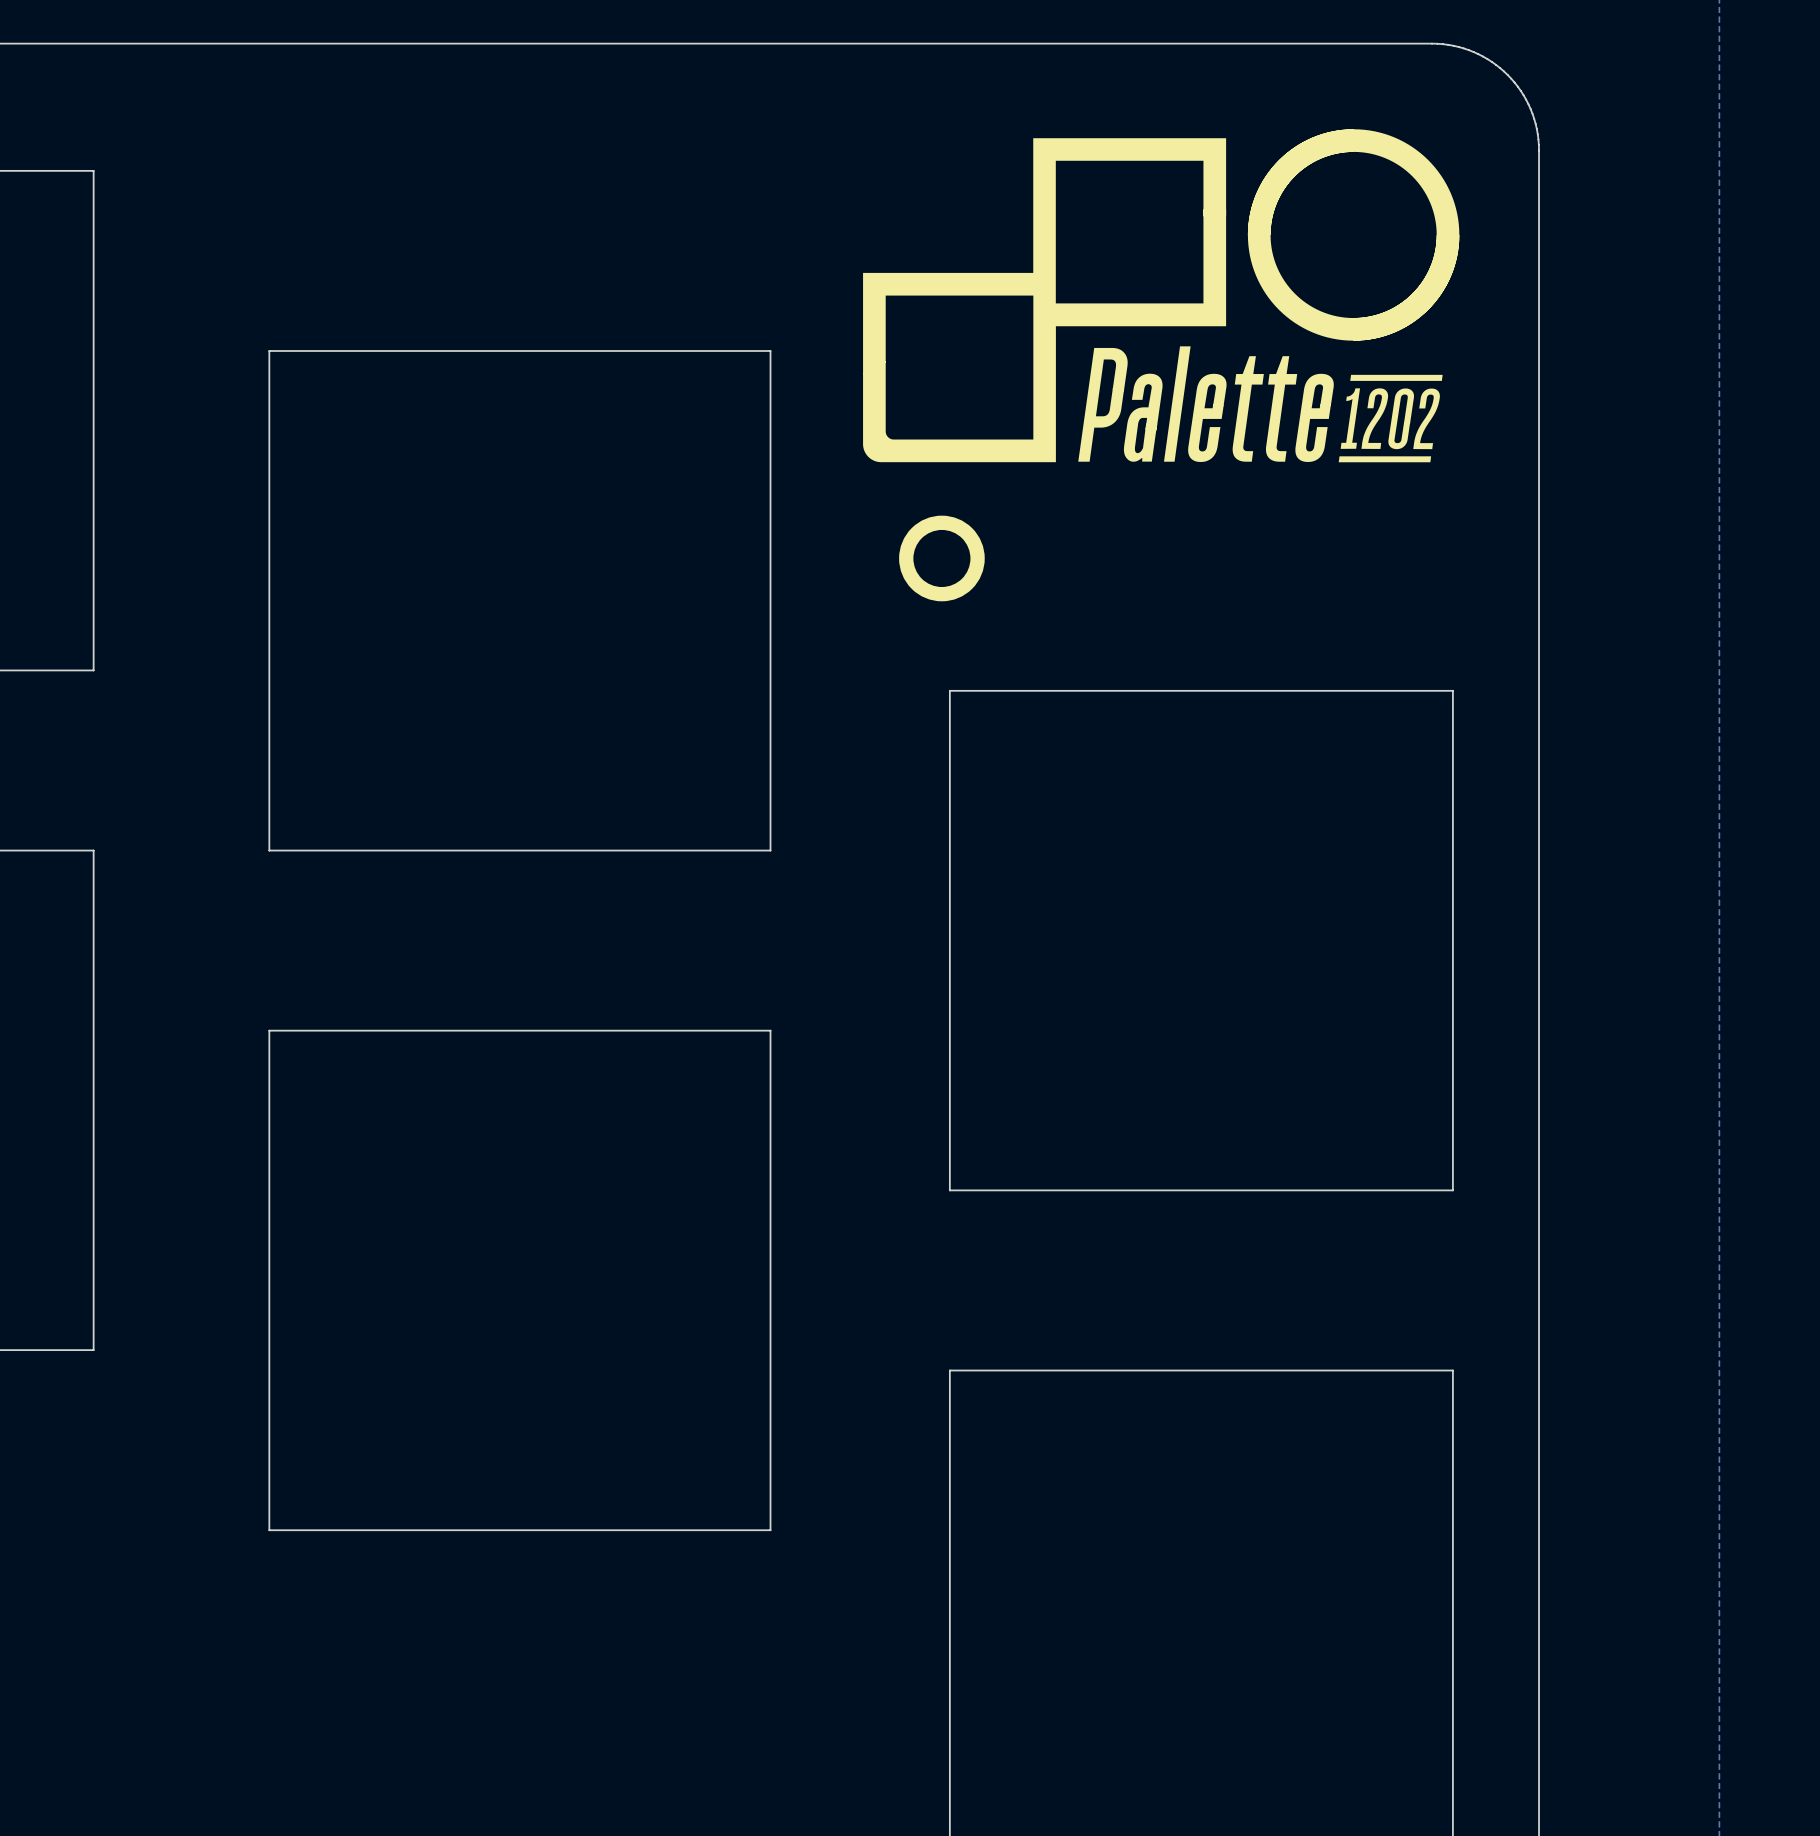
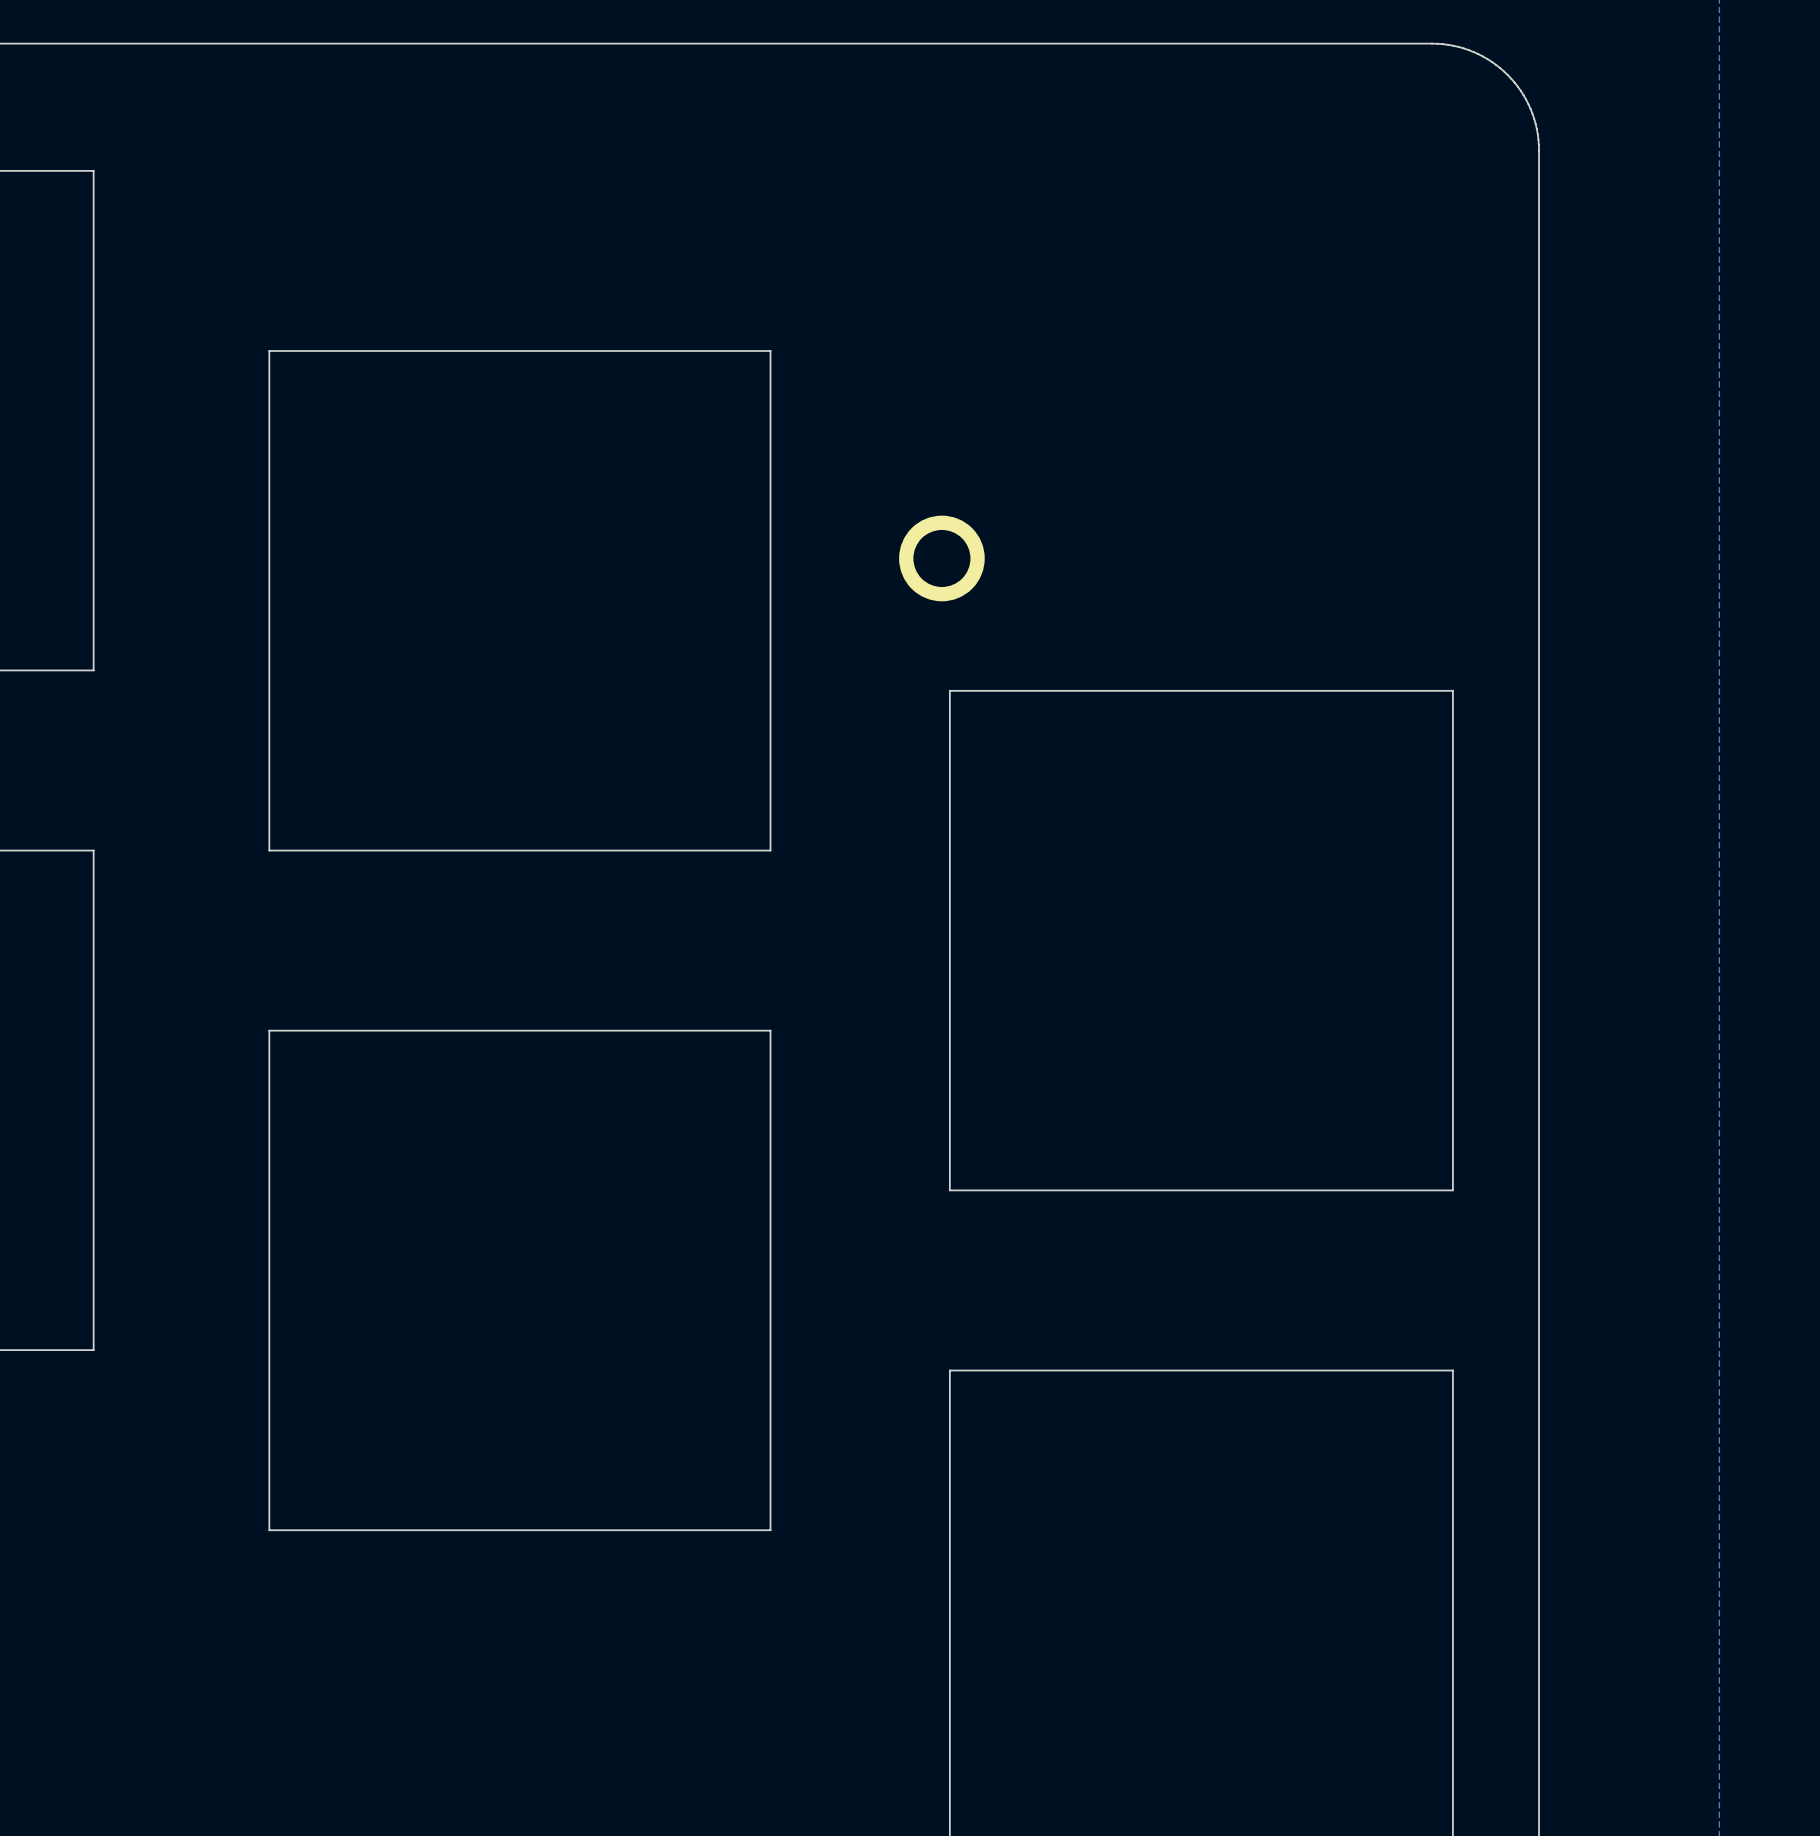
drawing: [863, 129, 1460, 463] -> none

